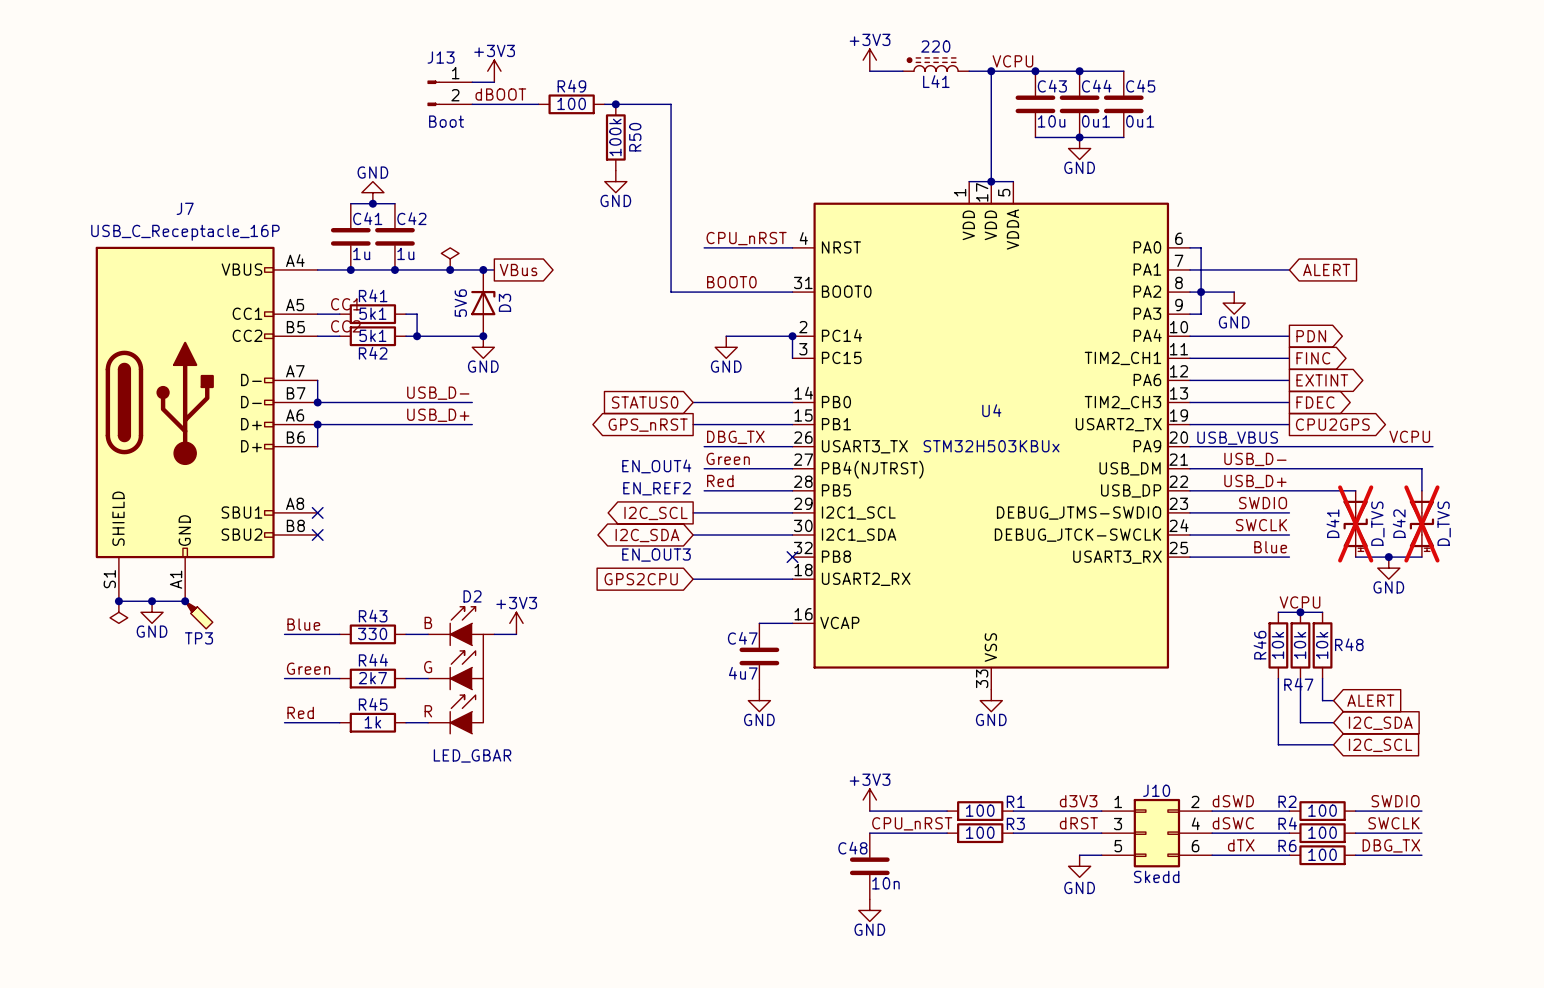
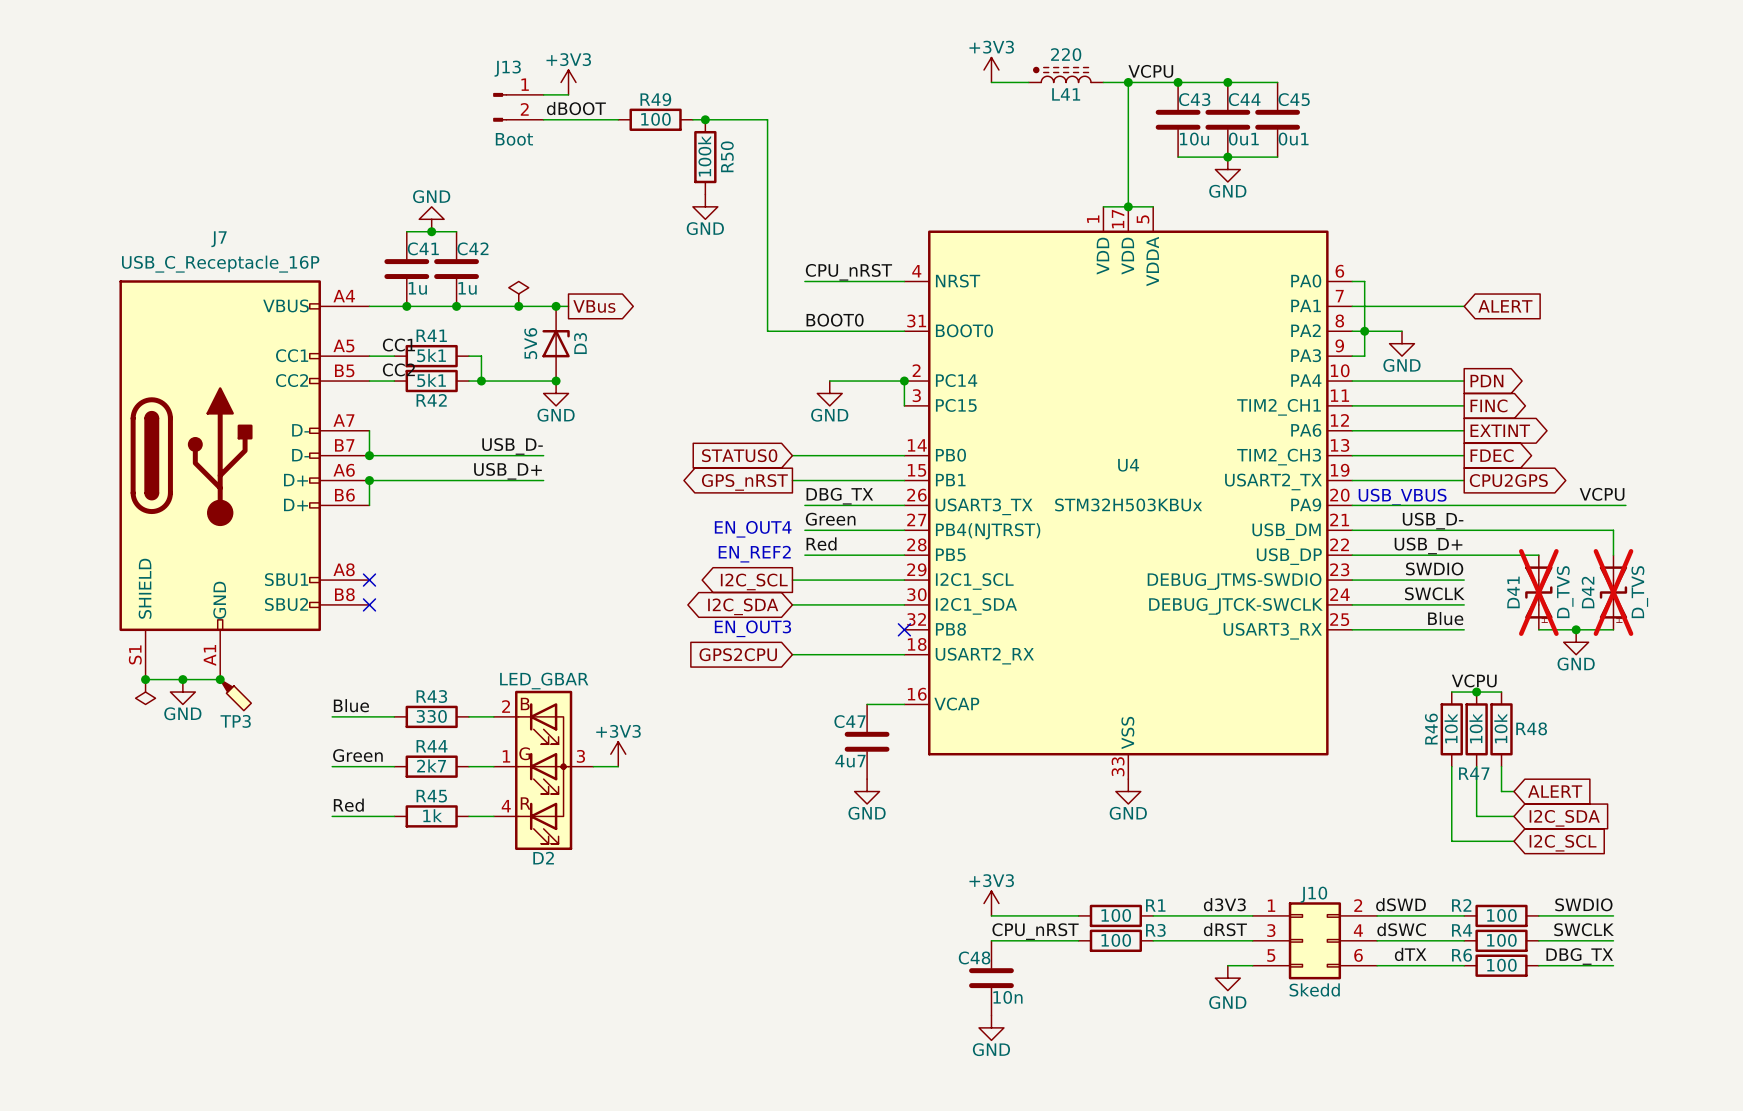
D2 name position: D2 (472, 596) -> D2 (543, 858)
D2 symbol: [428, 606, 495, 735] -> [493, 690, 594, 851]
power symbol position: +3V3 (516, 623) -> +3V3 (618, 754)
wire: (494, 634) (516, 634) -> (593, 766) (618, 766)
D2 value position: LED_GBAR (472, 755) -> LED_GBAR (544, 681)

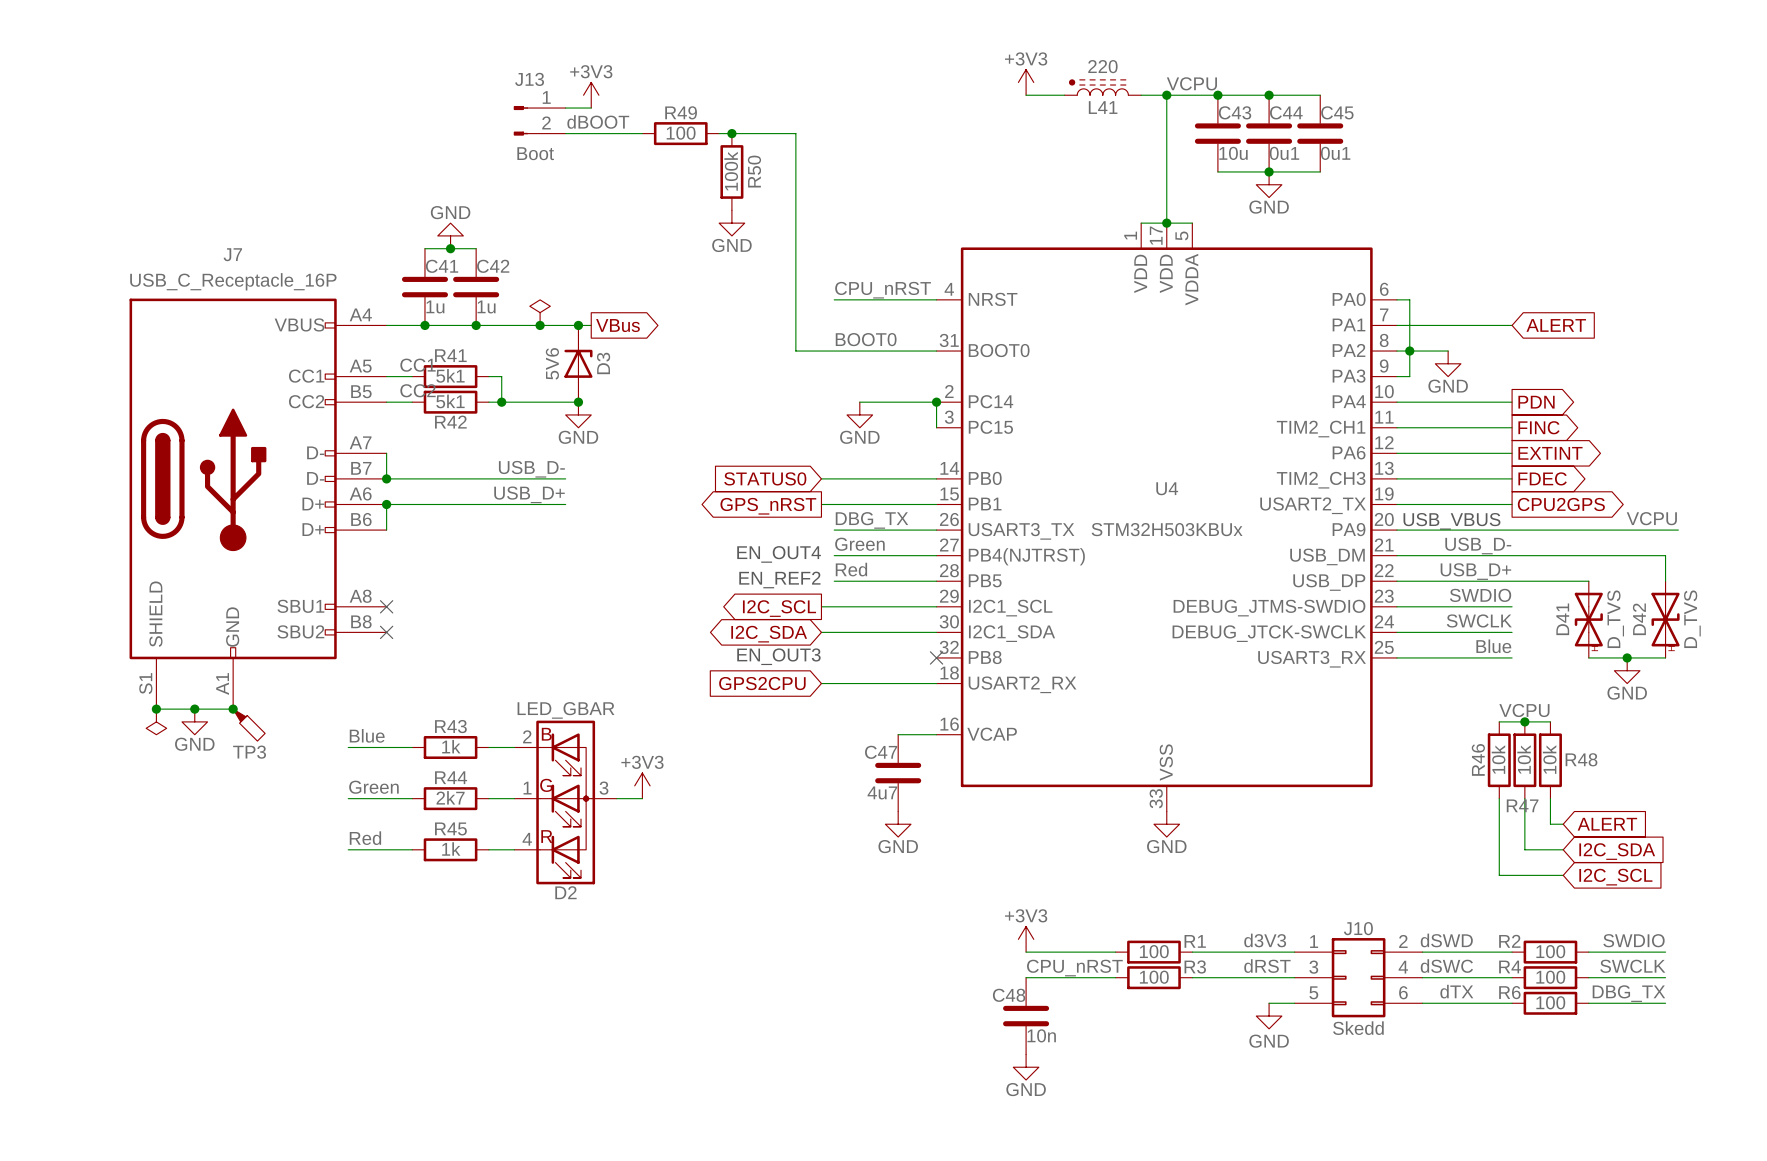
D41 do-not-place cross: (1538, 592) -> none
D42 do-not-place cross: (1613, 592) -> none
R43 value: 330 (431, 716) -> 1k (451, 746)

